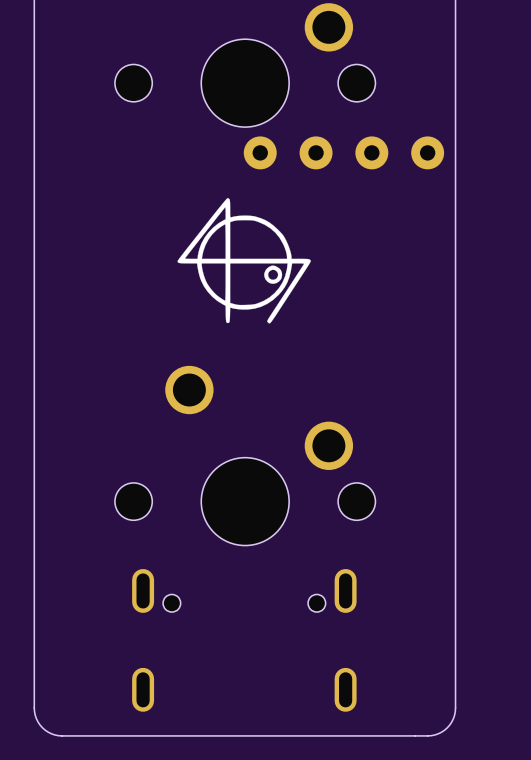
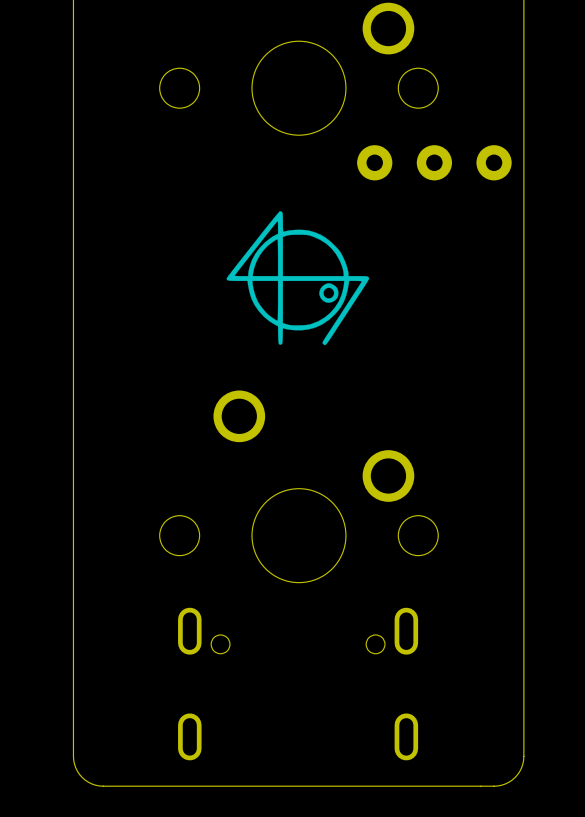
part: (260, 152) -> none

